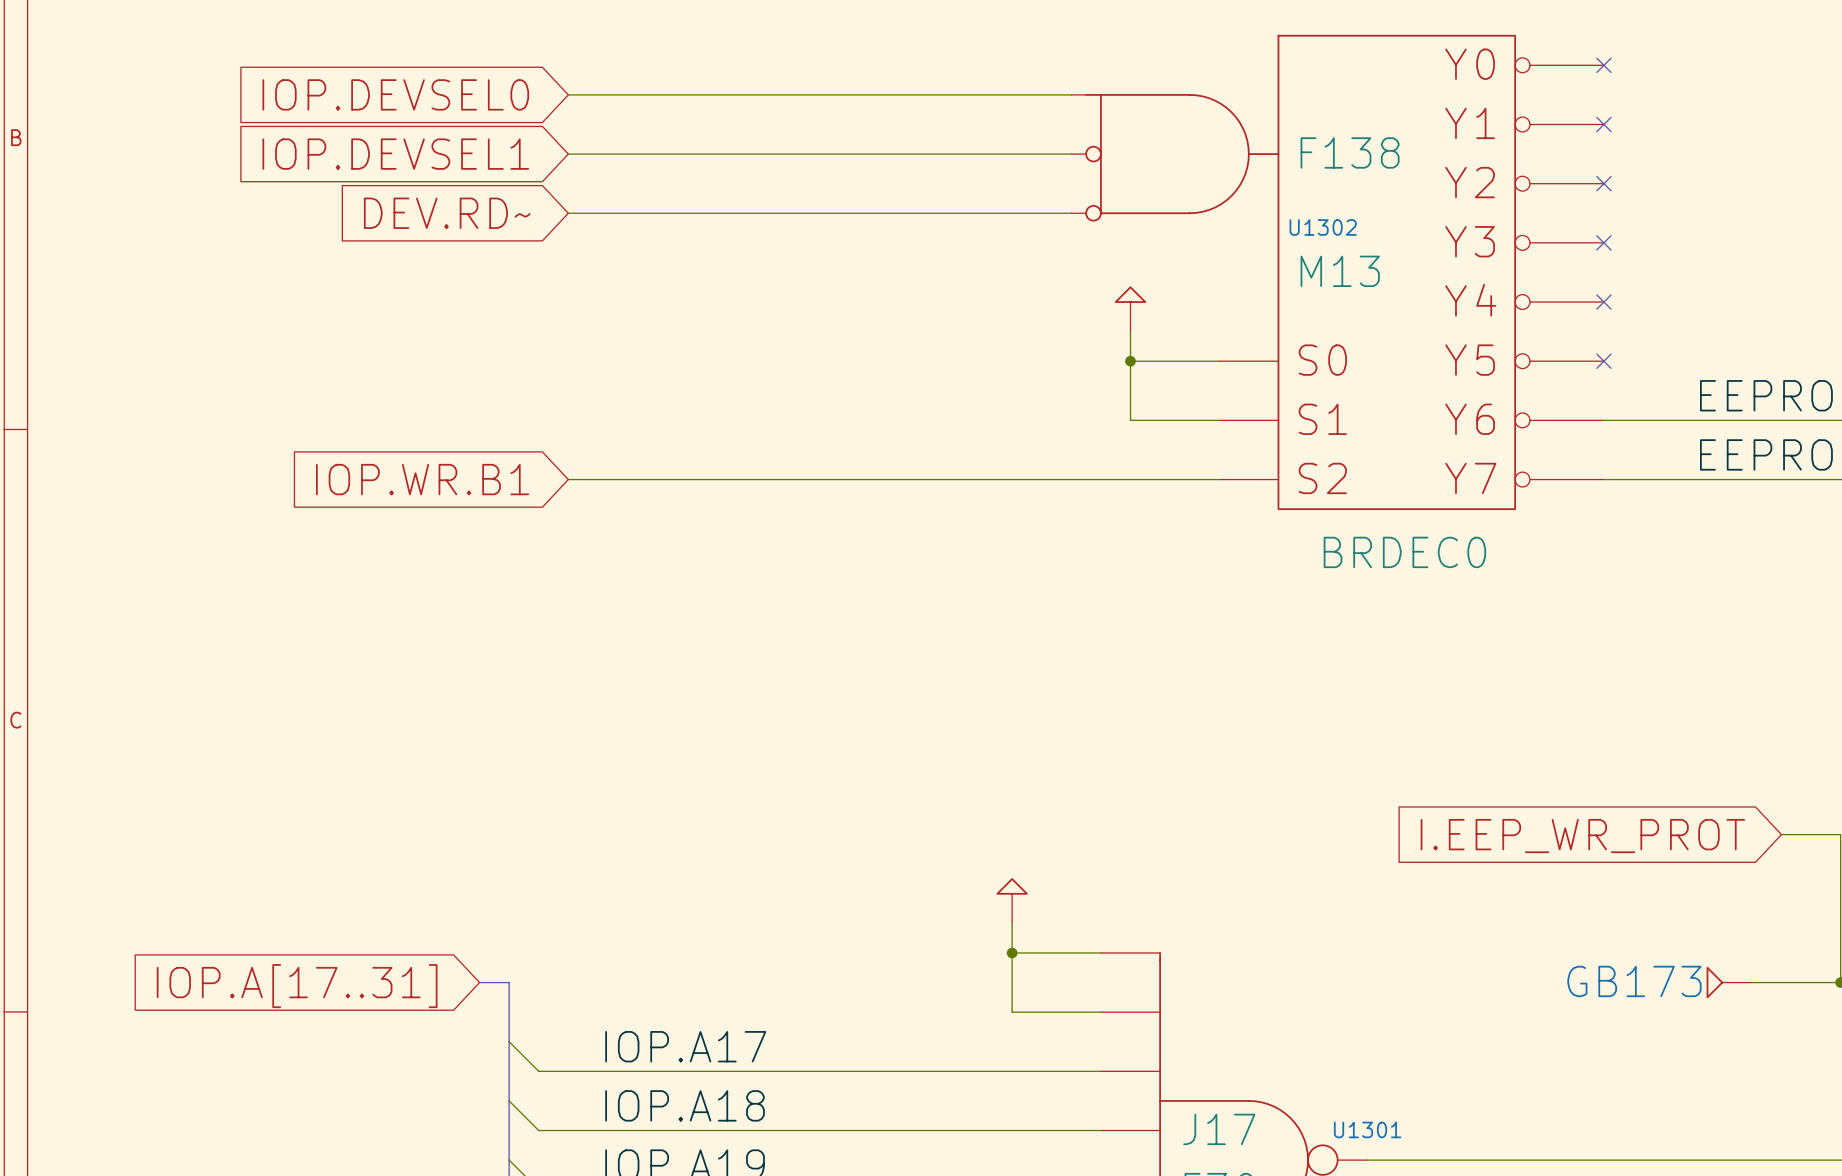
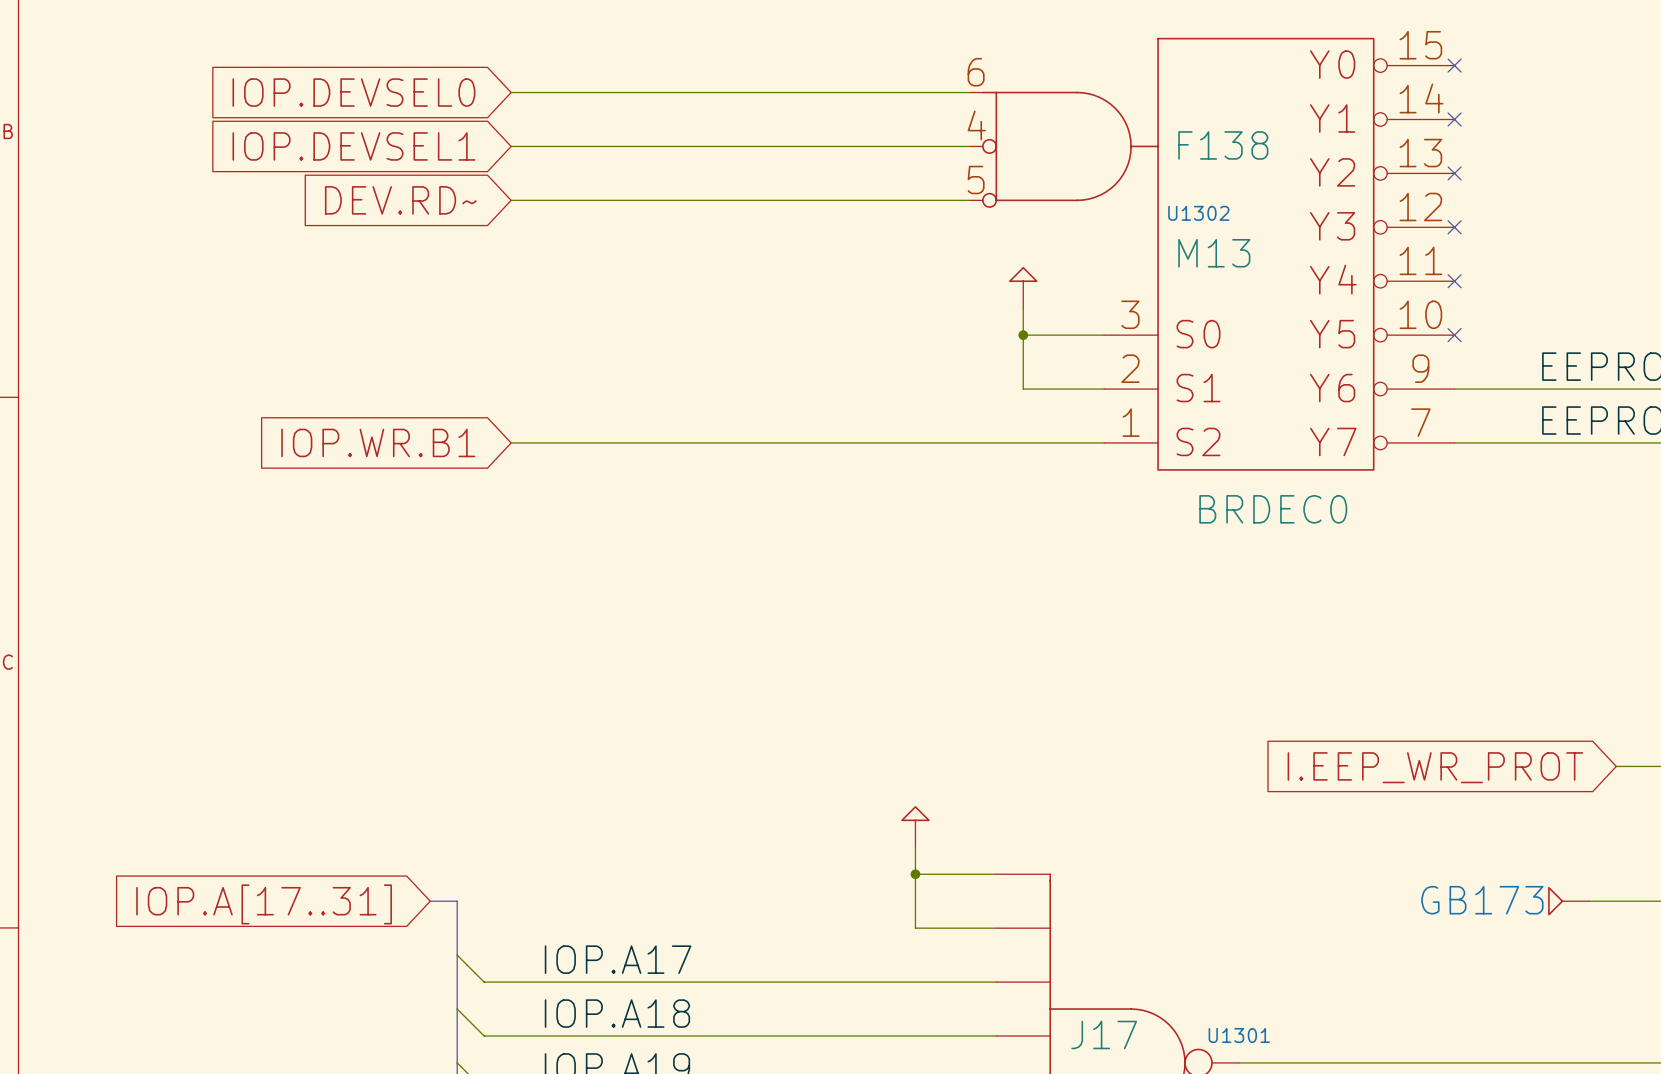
U1302 symbol: [1071, 34, 1604, 511] -> [969, 37, 1455, 471]

